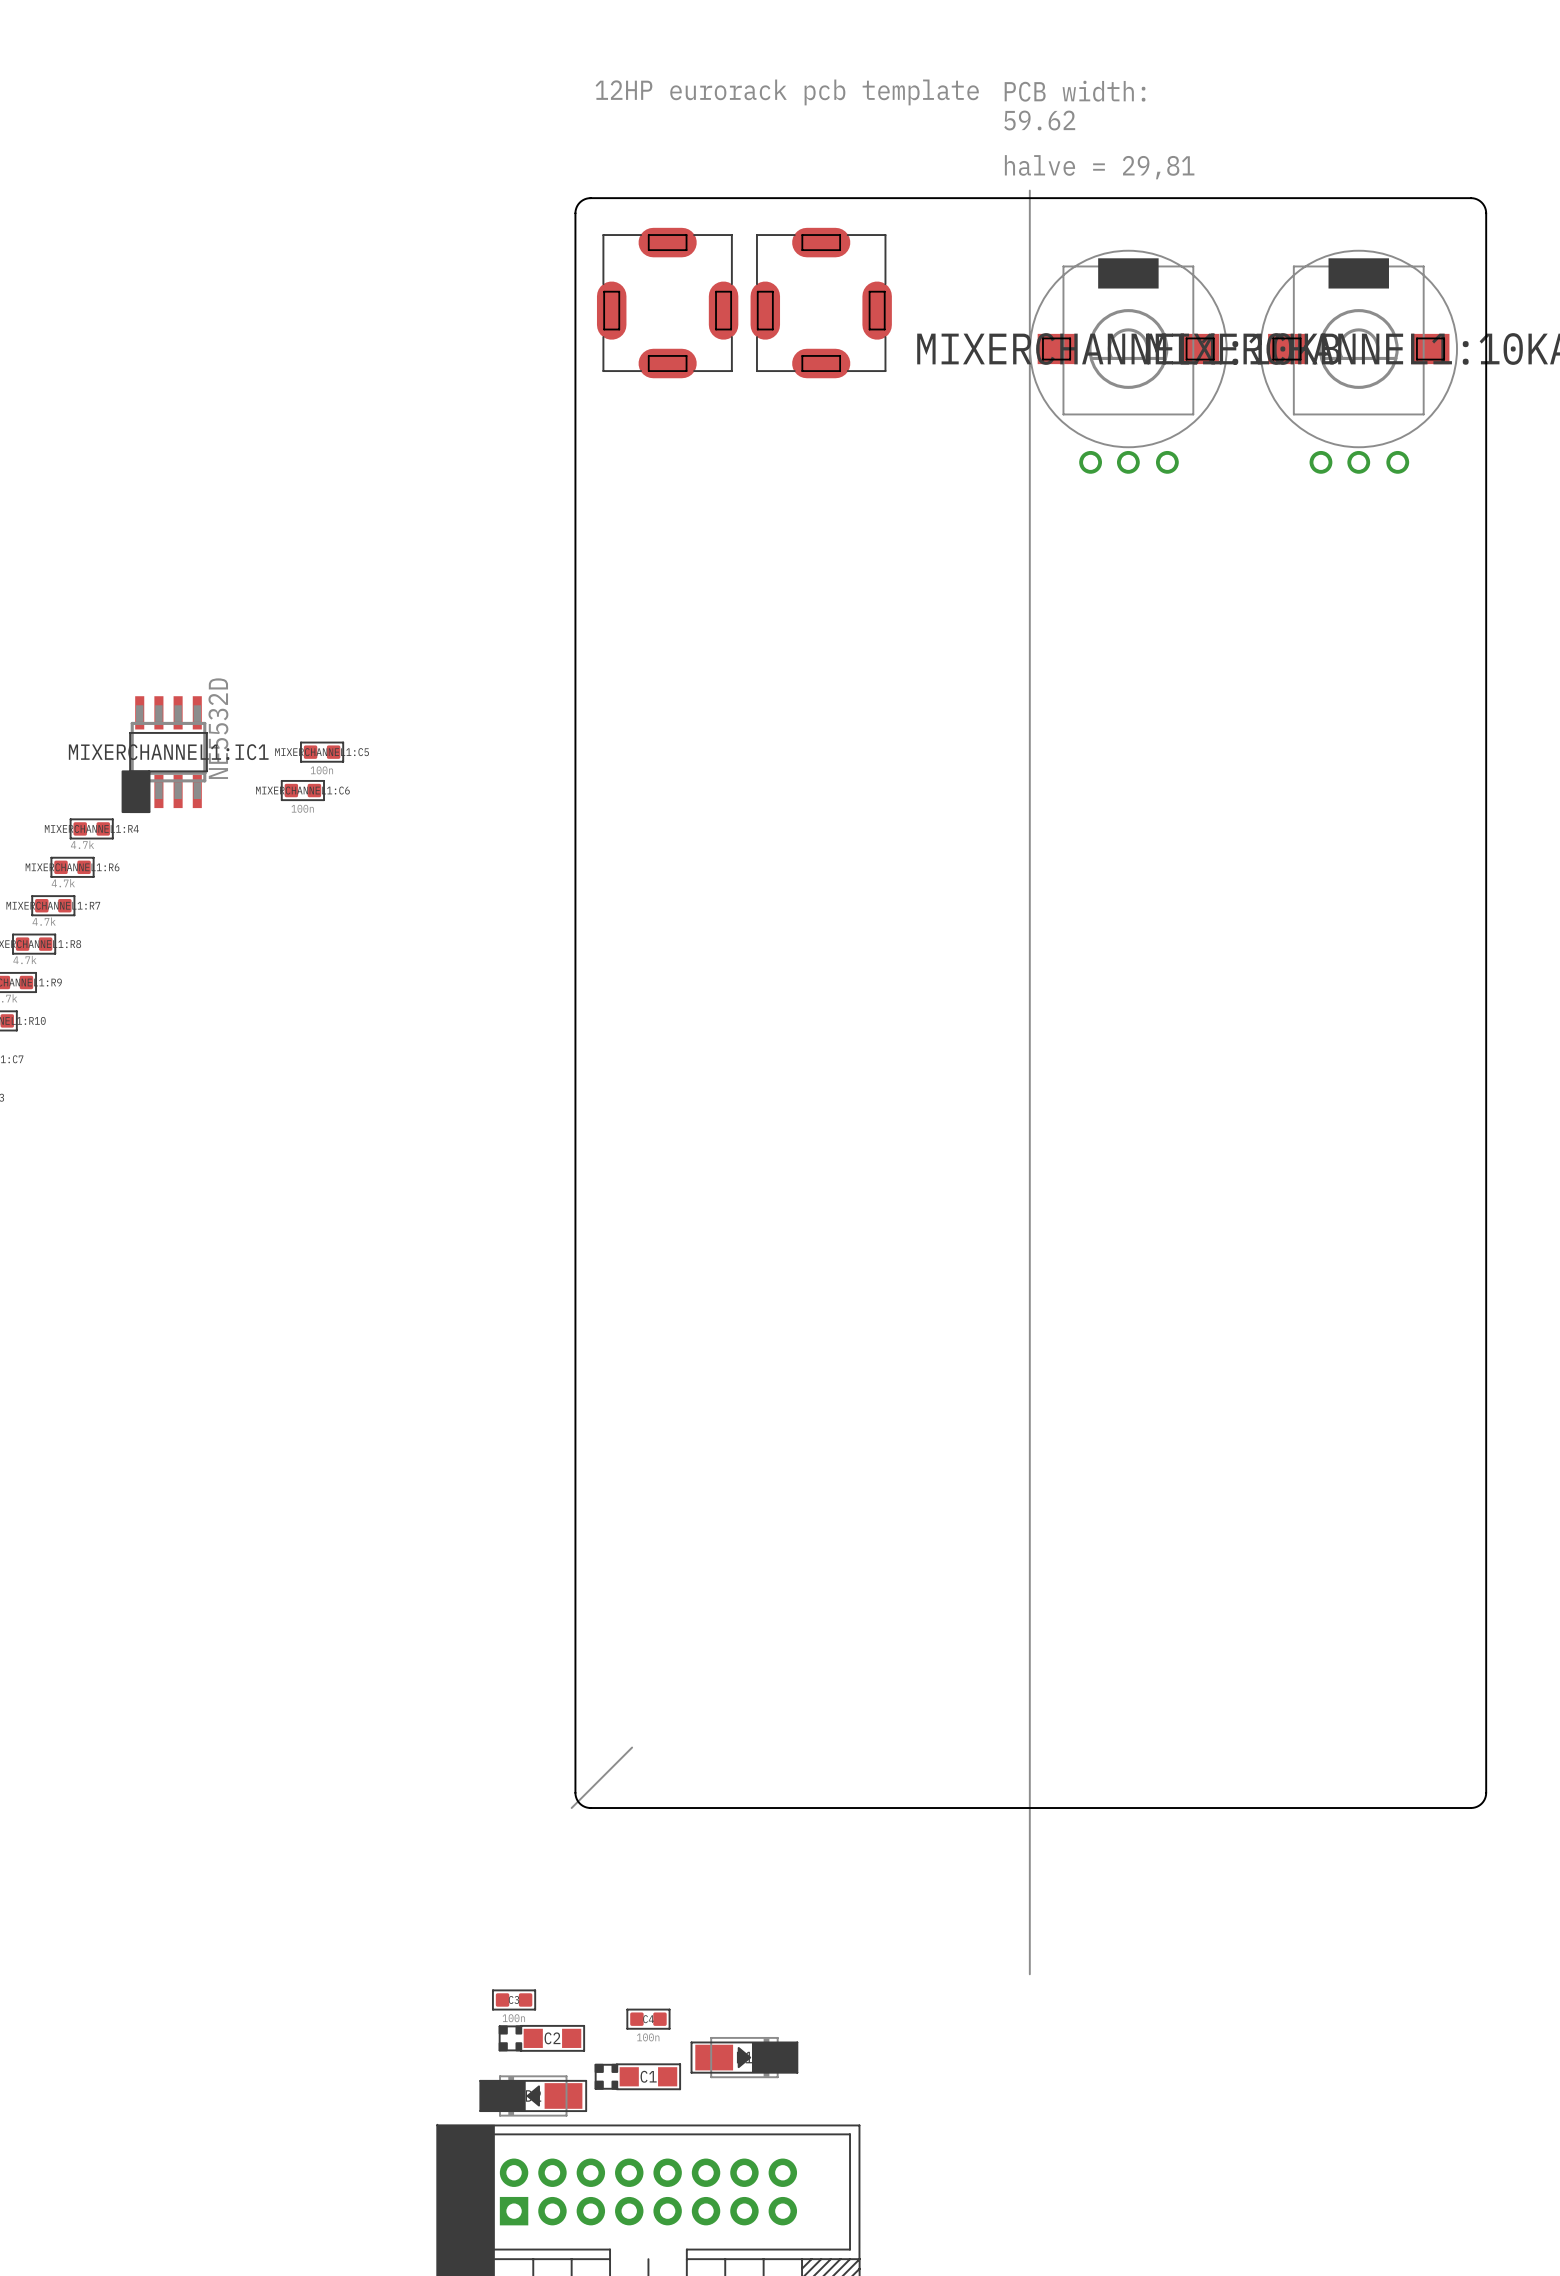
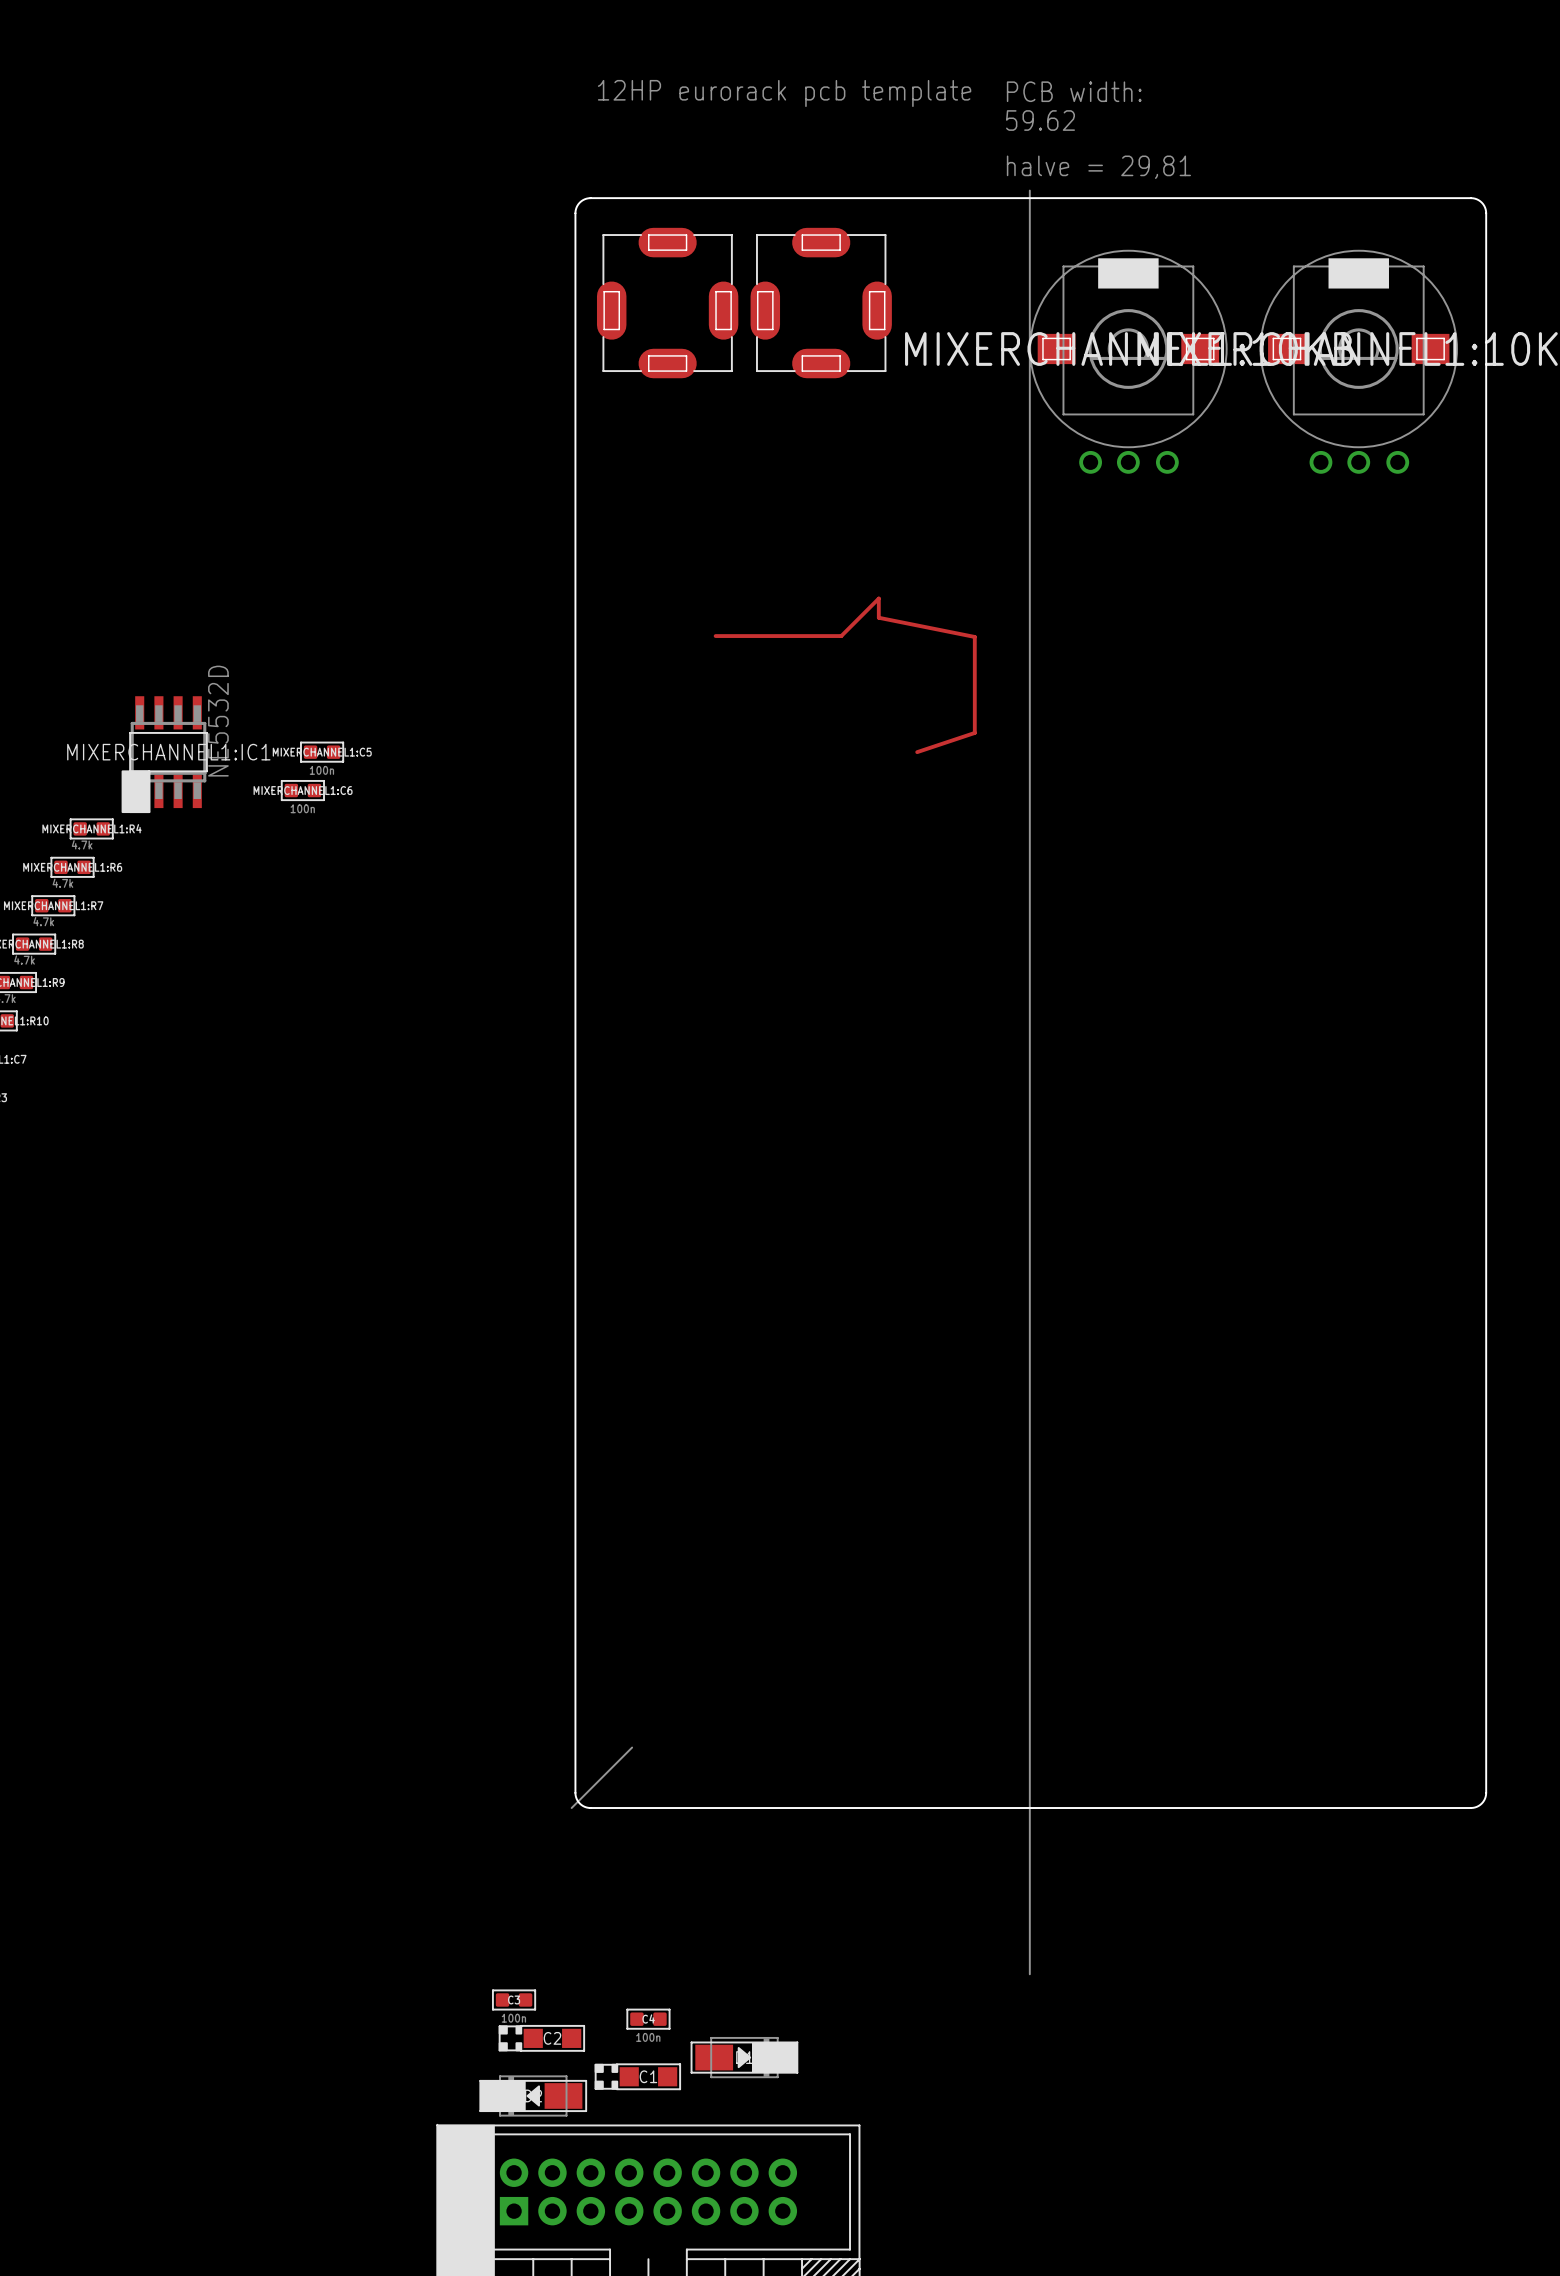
track: none -> (715, 636) (841, 636) (878, 598) (878, 617) (974, 636) (974, 732) (917, 752)

